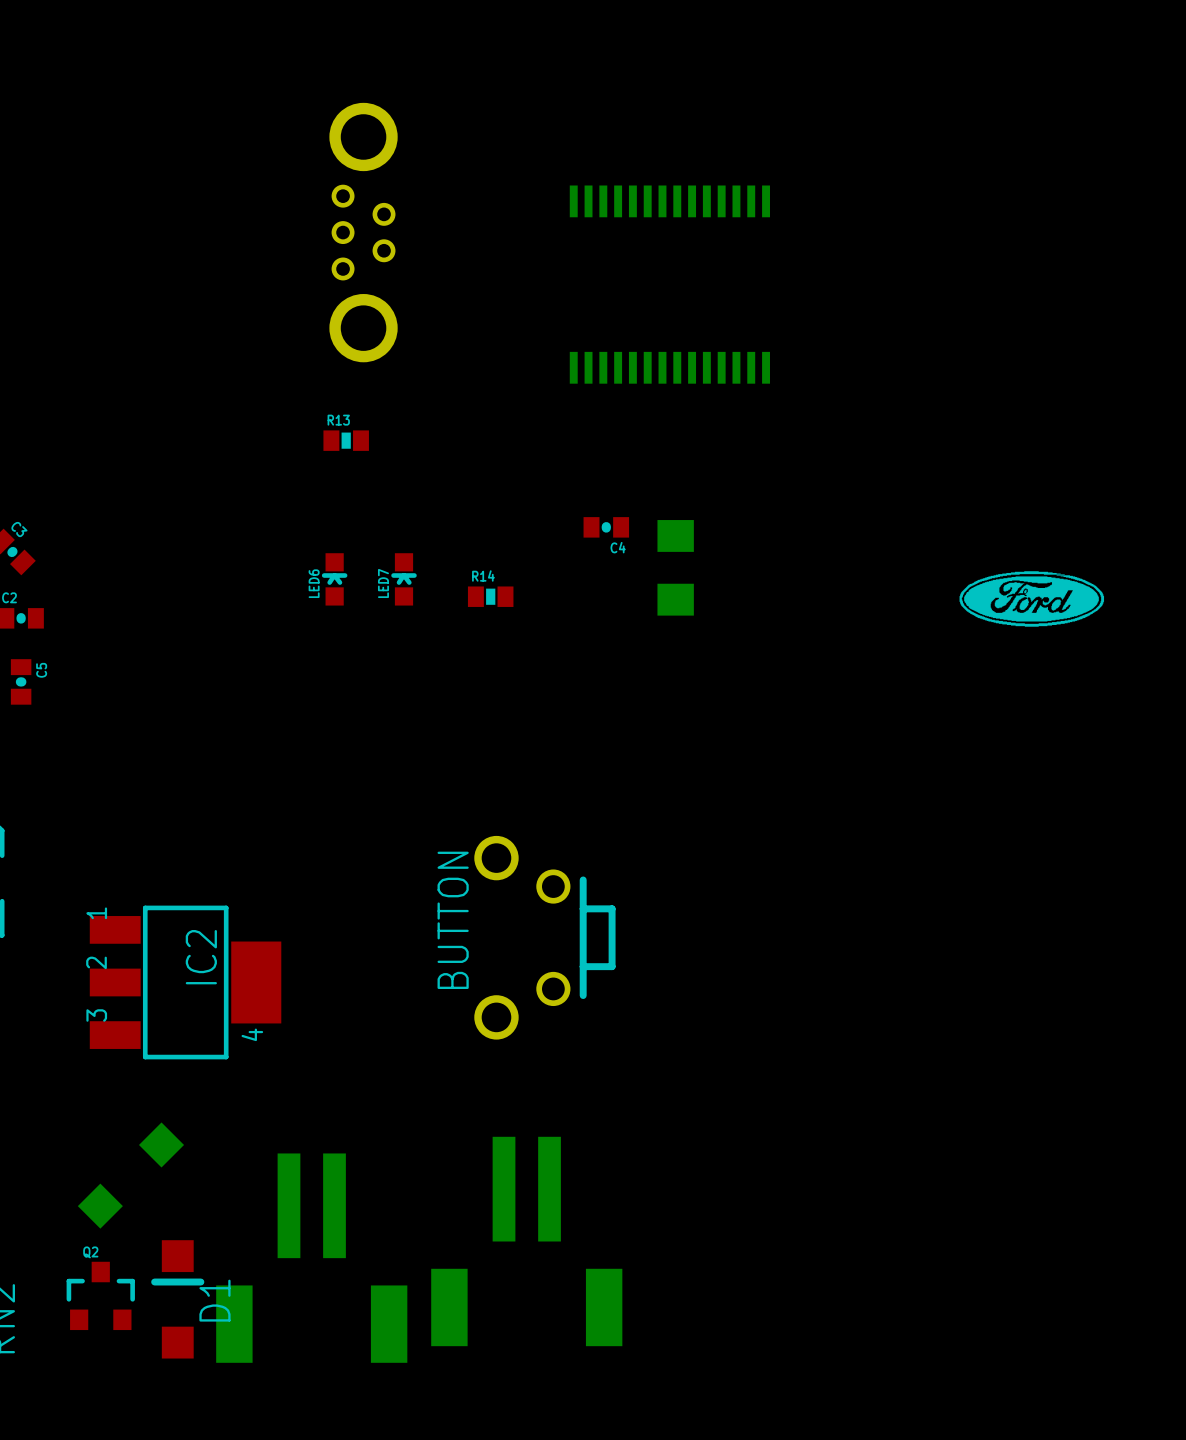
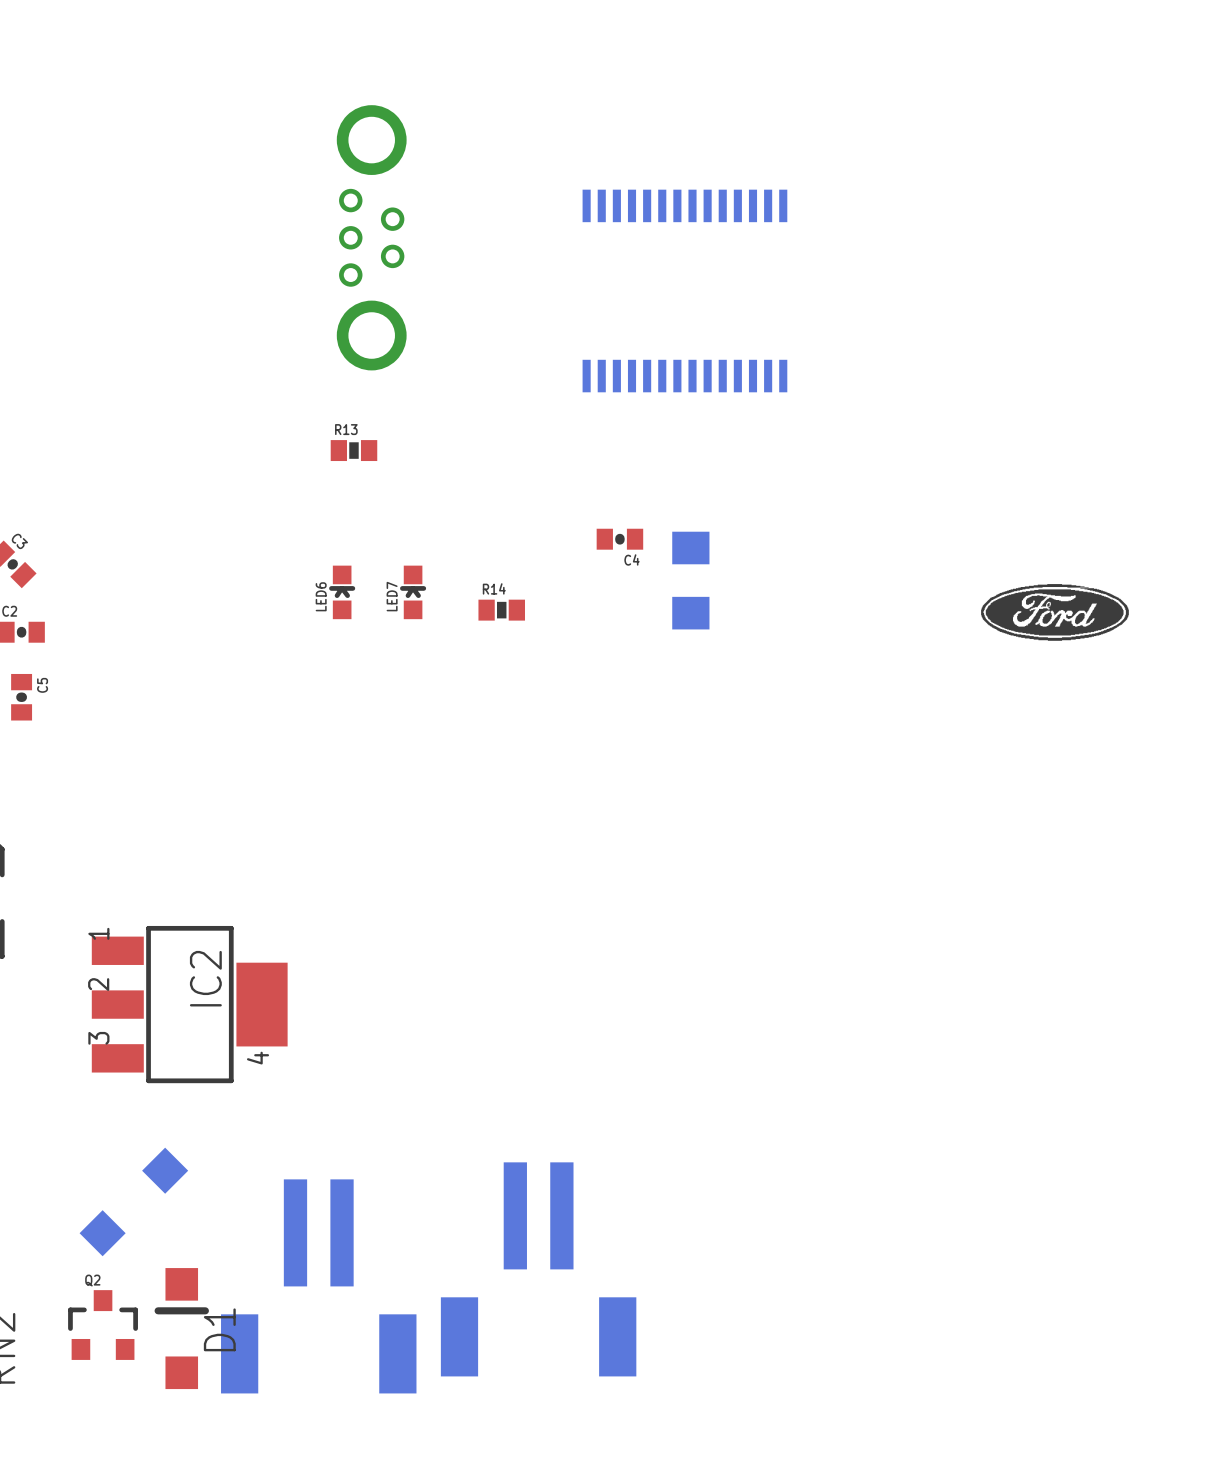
BUTTON: (544, 937) -> none

